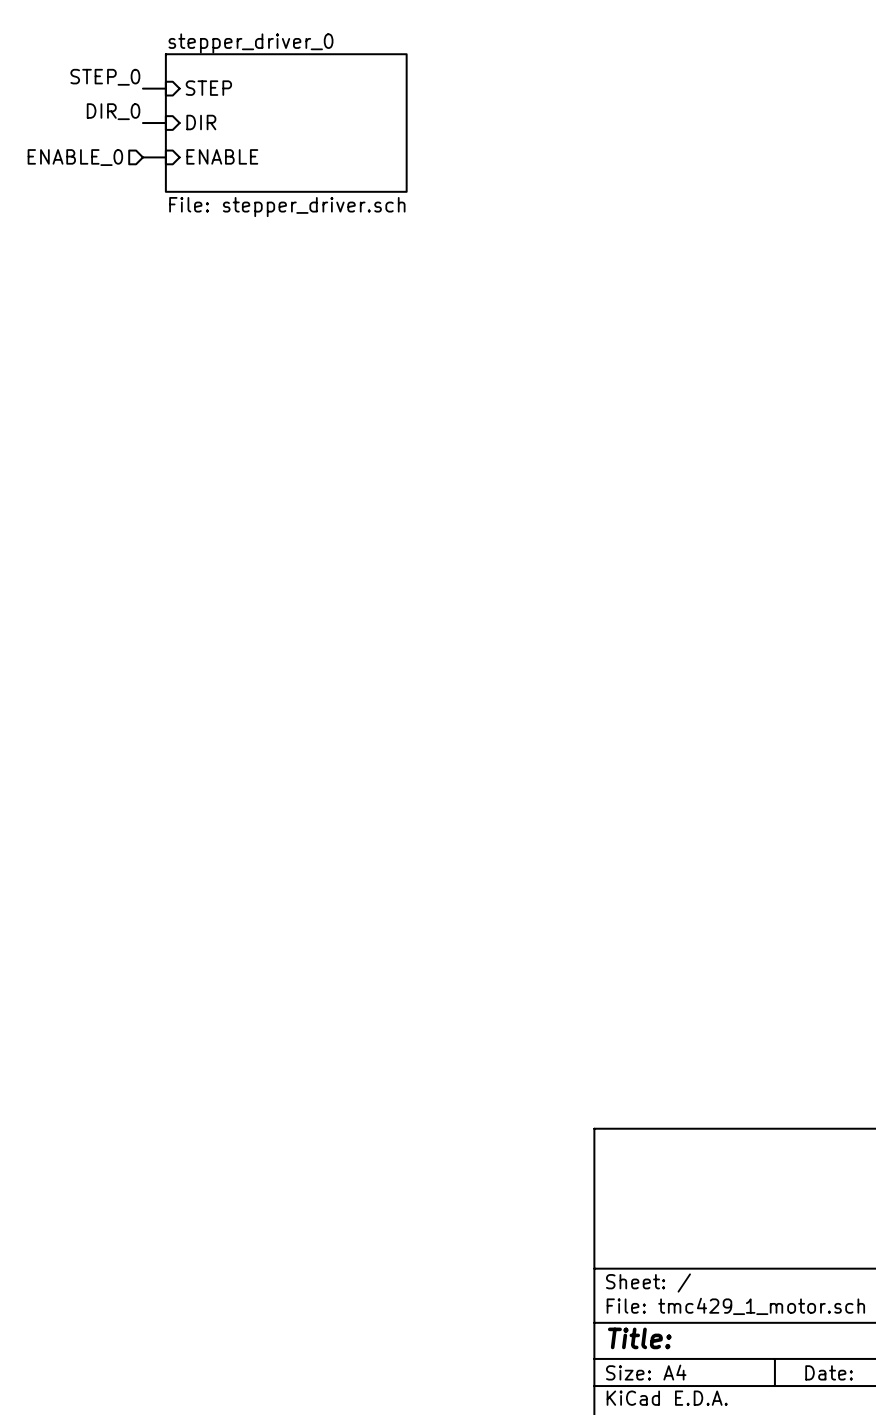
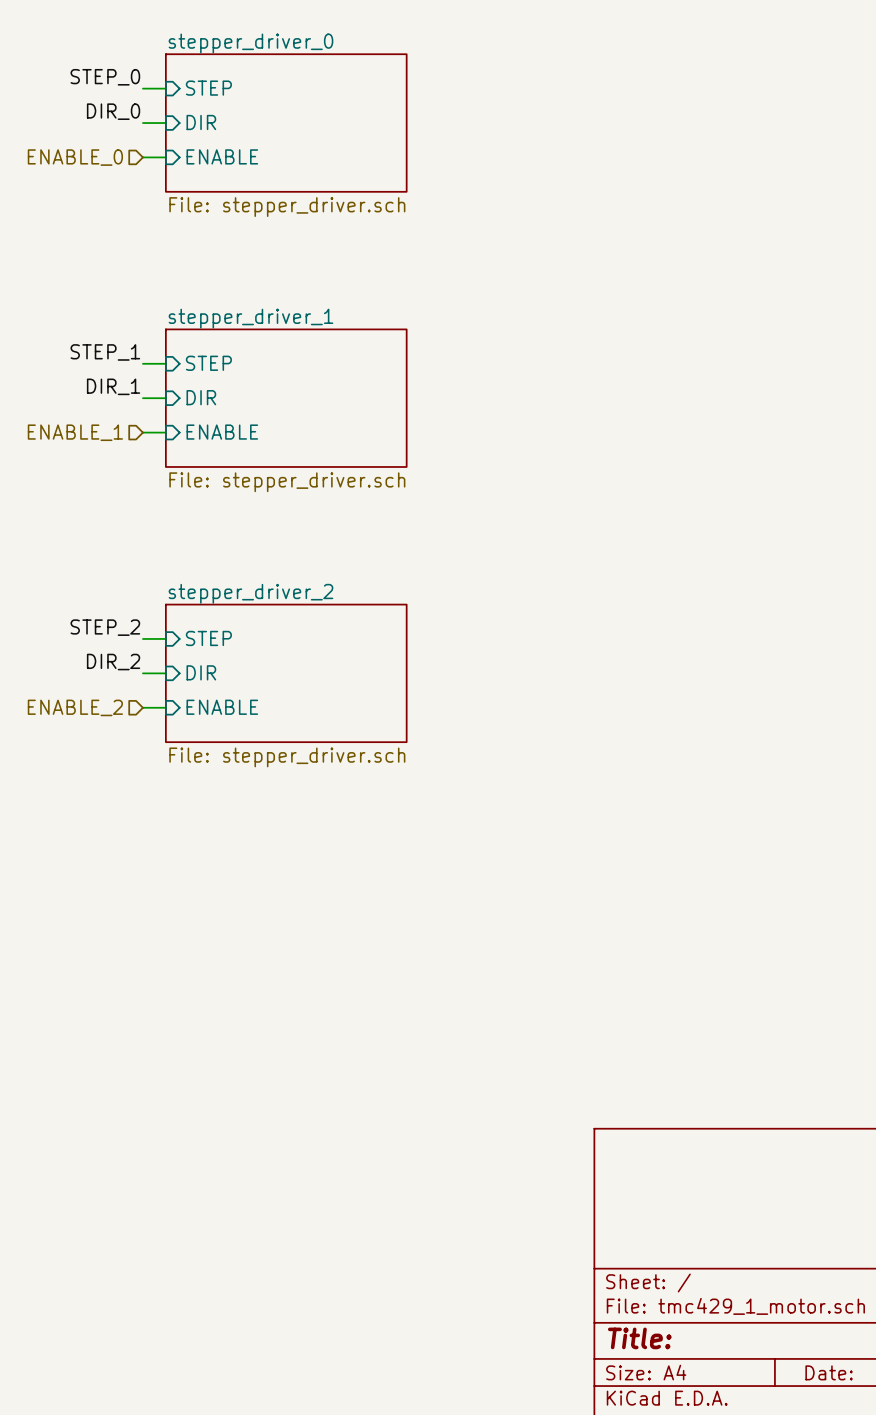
label: none -> STEP_1 (105, 352)
wire: none -> (142, 363) (165, 363)
sheet pin: none -> STEP (208, 363)
label: none -> DIR_1 (113, 386)
sheet pin: none -> DIR (201, 397)
wire: none -> (142, 398) (165, 398)
sheet stepper_driver_1: none -> File: stepper_driver.sch (286, 398)
hierarchical label: none -> ENABLE_1 (75, 432)
wire: none -> (142, 432) (165, 432)
sheet pin: none -> ENABLE (222, 432)
label: none -> STEP_2 (105, 627)
wire: none -> (142, 638) (165, 638)
sheet pin: none -> STEP (208, 638)
label: none -> DIR_2 (113, 662)
sheet pin: none -> DIR (201, 672)
wire: none -> (142, 673) (165, 673)
sheet stepper_driver_2: none -> File: stepper_driver.sch (286, 673)
hierarchical label: none -> ENABLE_2 (75, 707)
wire: none -> (142, 707) (165, 707)
sheet pin: none -> ENABLE (222, 707)

